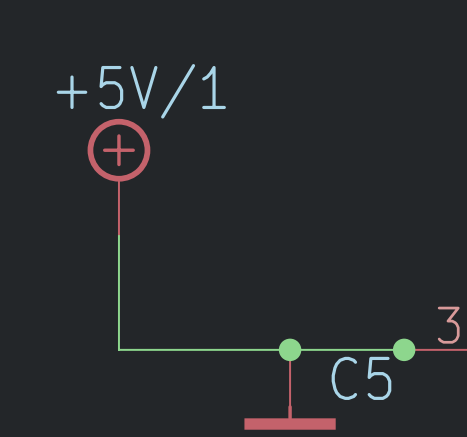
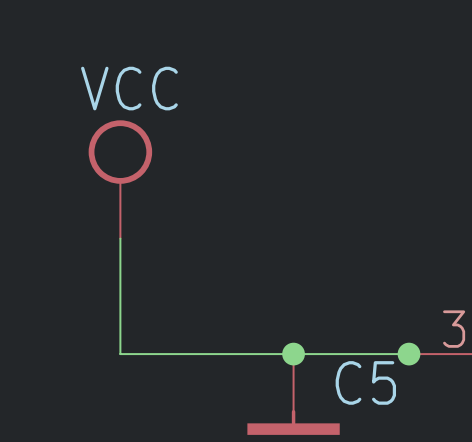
power symbol: +5V/1 (118, 177) -> VCC (120, 179)

